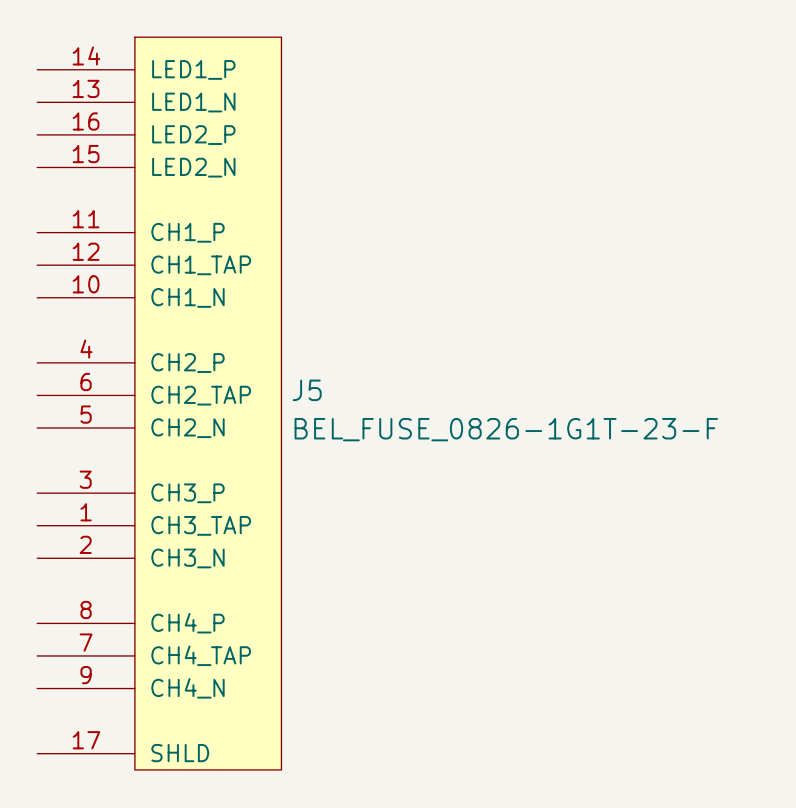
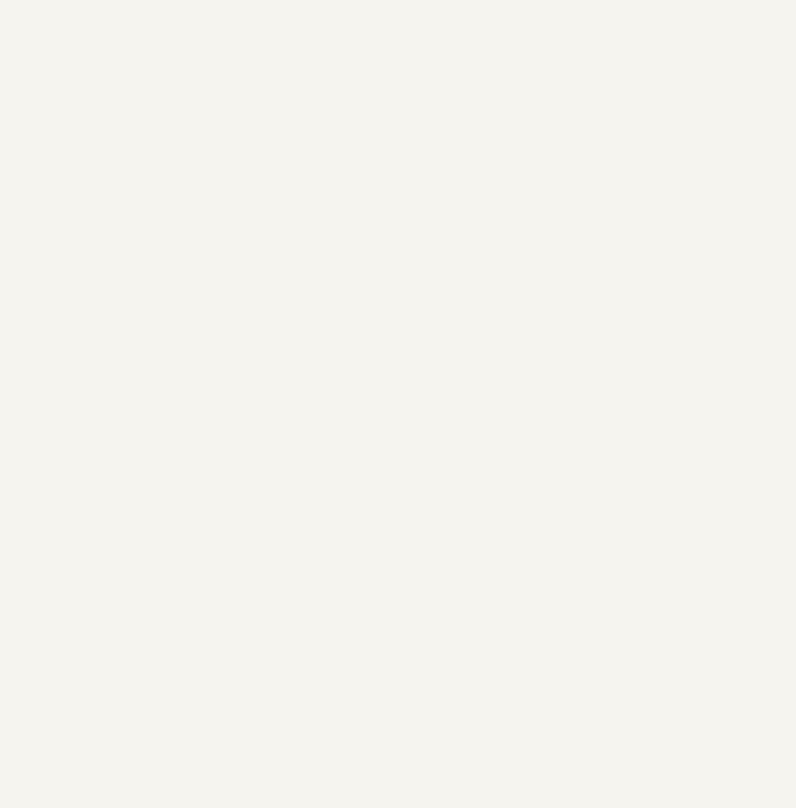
J5: BEL_FUSE_0826-1G1T-23-F (159, 403) -> none

